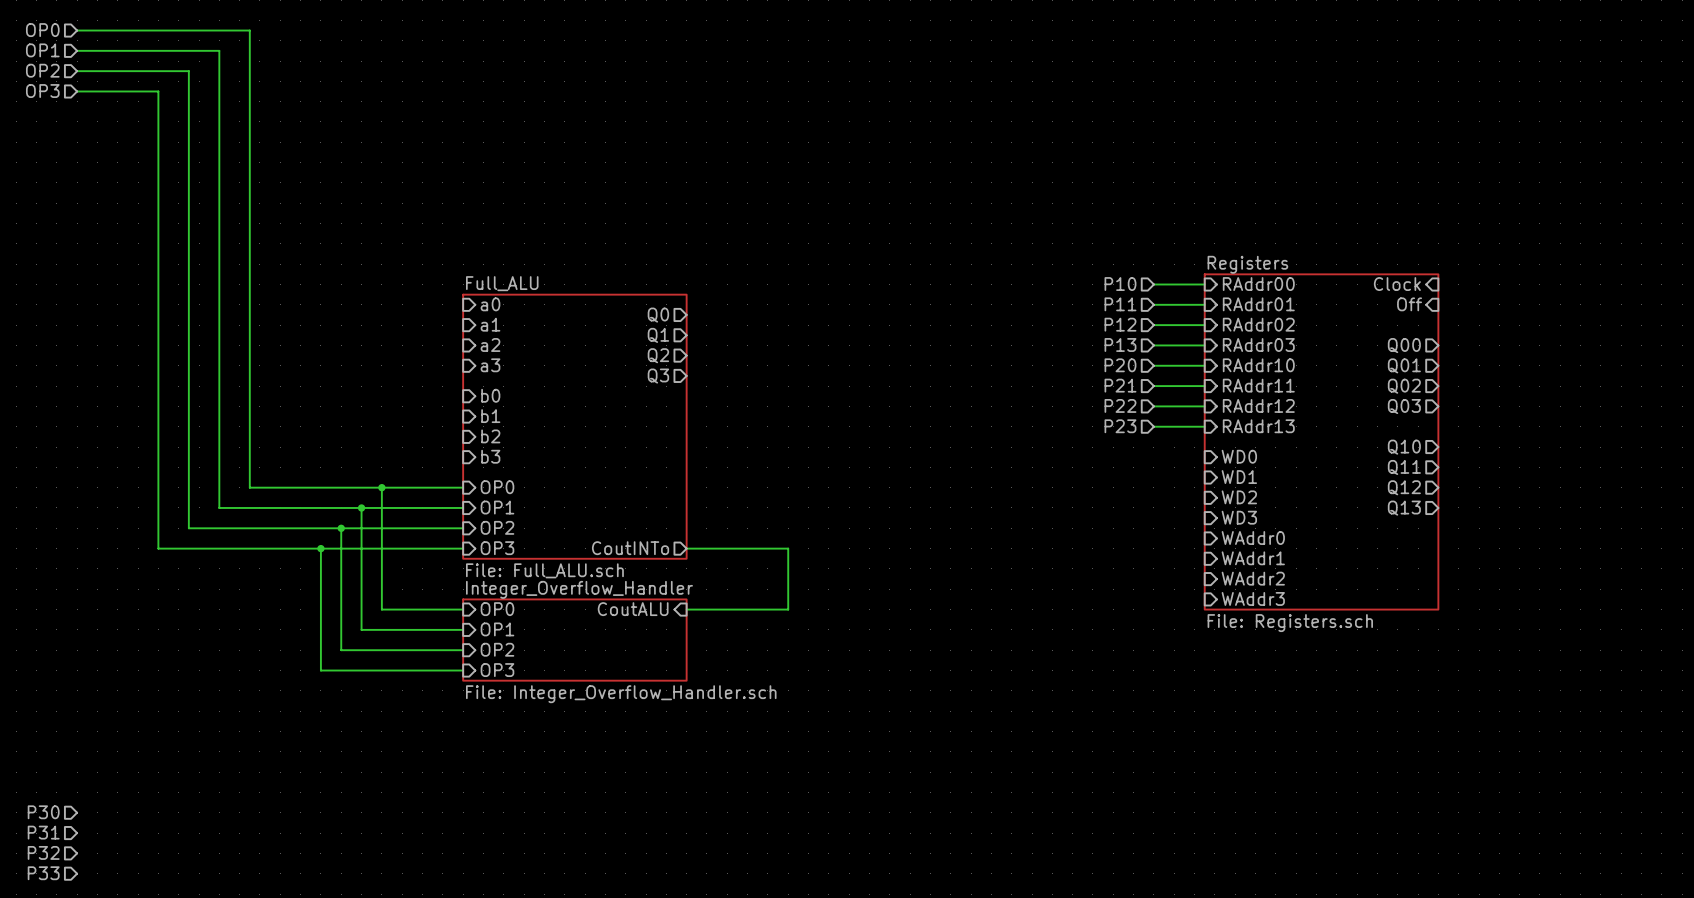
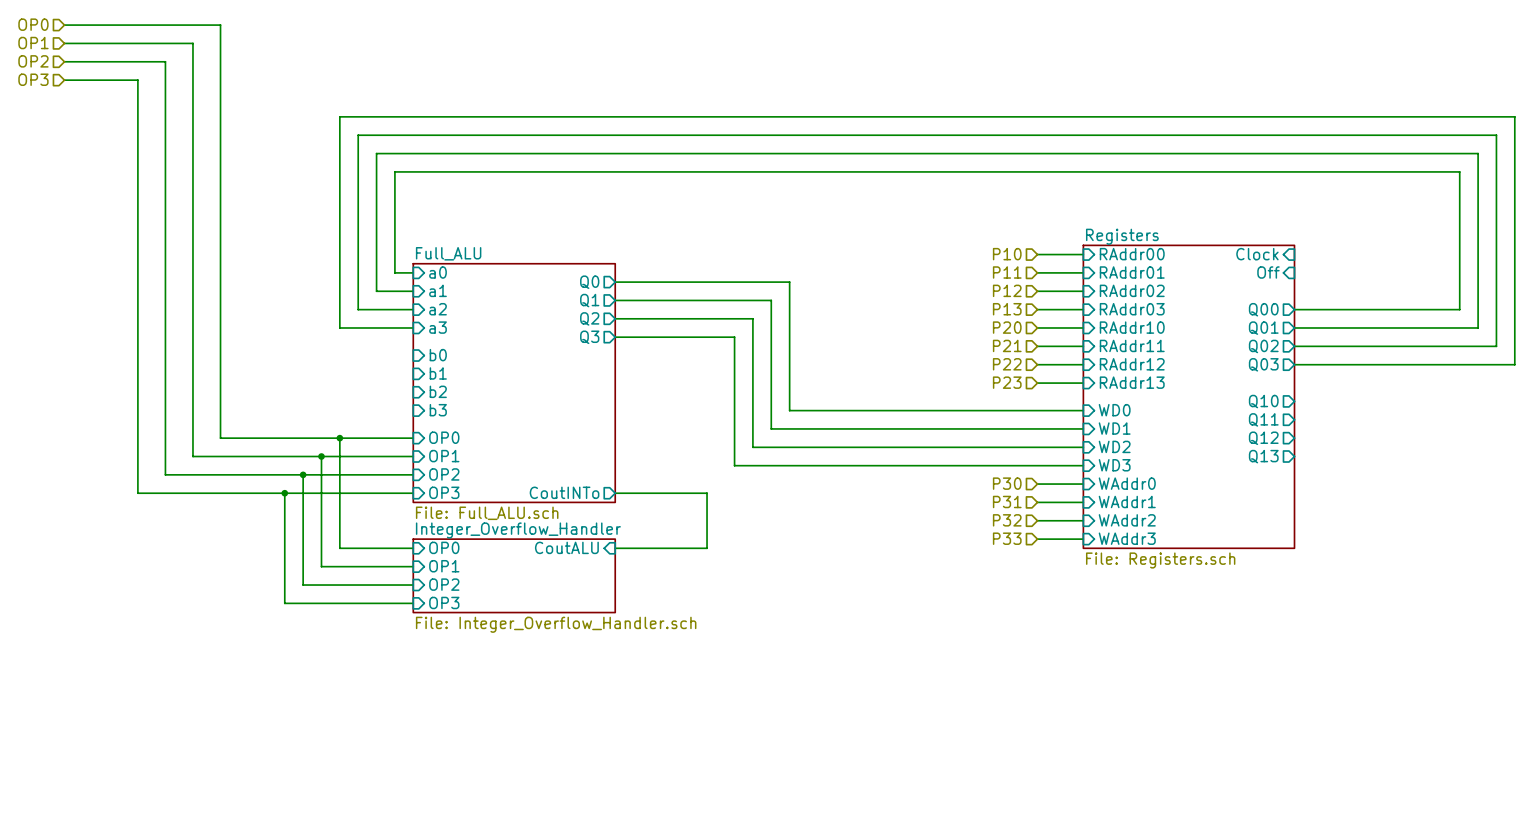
wire: none -> (413, 272) (394, 272) (394, 171) (1459, 171) (1459, 309) (1294, 309)
wire: none -> (615, 282) (789, 282) (789, 410) (1083, 410)
wire: none -> (413, 291) (376, 291) (376, 153) (1478, 153) (1478, 327) (1294, 327)
wire: none -> (615, 300) (771, 300) (771, 428) (1083, 428)
wire: none -> (413, 309) (358, 309) (358, 135) (1496, 135) (1496, 346) (1294, 346)
wire: none -> (615, 318) (752, 318) (752, 447) (1083, 447)
wire: none -> (413, 327) (339, 327) (339, 116) (1514, 116) (1514, 364) (1294, 364)
wire: none -> (615, 337) (734, 337) (734, 465) (1083, 465)
hierarchical label: none -> P30 (1007, 483)
wire: none -> (1037, 484) (1083, 484)
hierarchical label: none -> P31 (1007, 501)
wire: none -> (1037, 502) (1083, 502)
hierarchical label: none -> P32 (1007, 520)
wire: none -> (1037, 520) (1083, 520)
hierarchical label: none -> P33 (1007, 538)
wire: none -> (1037, 539) (1083, 539)
hierarchical label: P30 (43, 812) -> none
hierarchical label: P31 (43, 832) -> none
hierarchical label: P32 (43, 852) -> none
hierarchical label: P33 (43, 873) -> none

